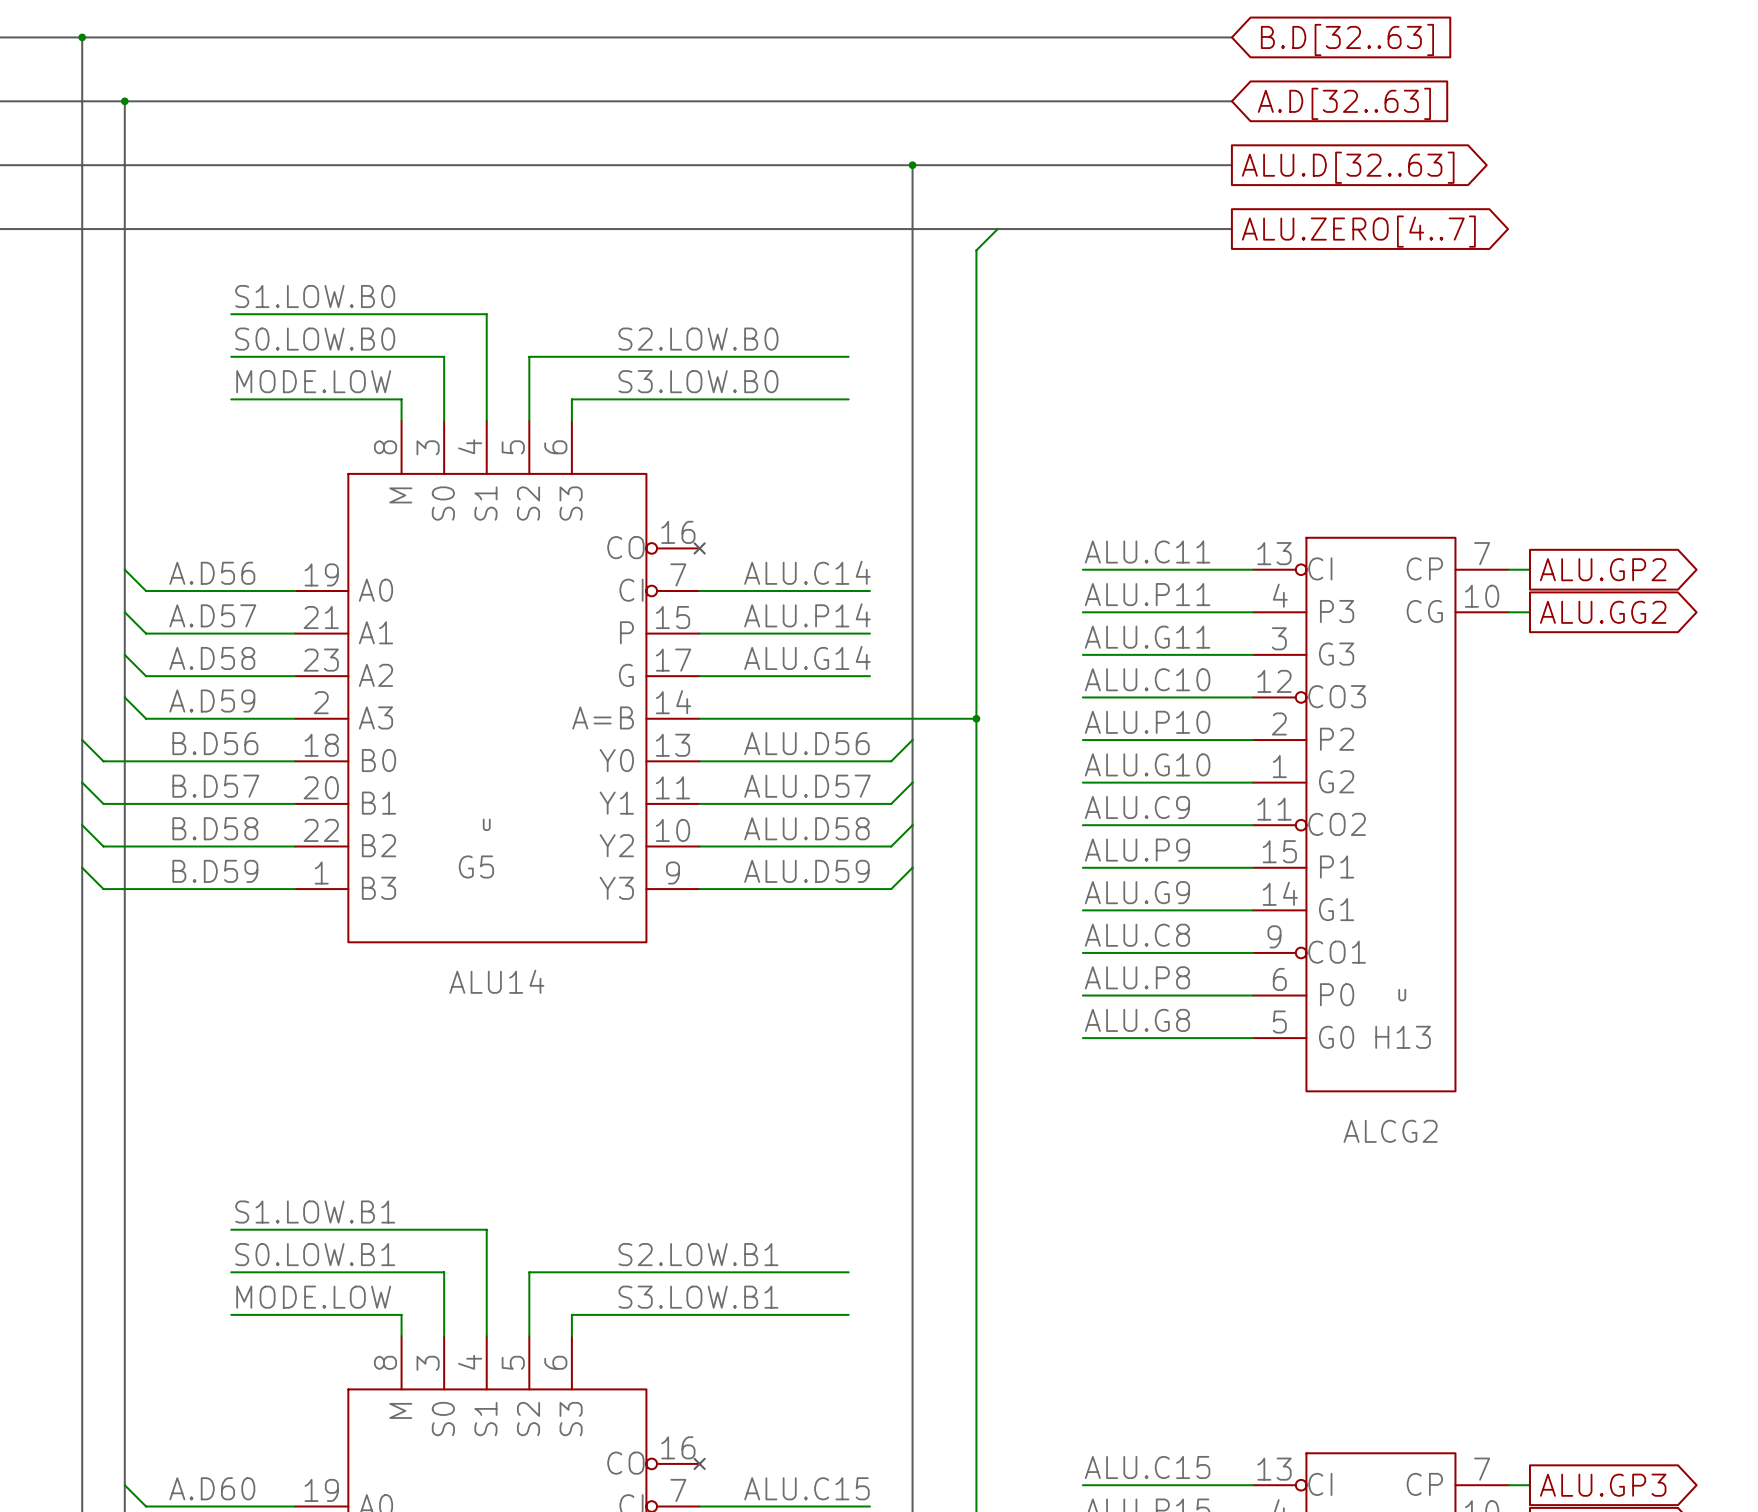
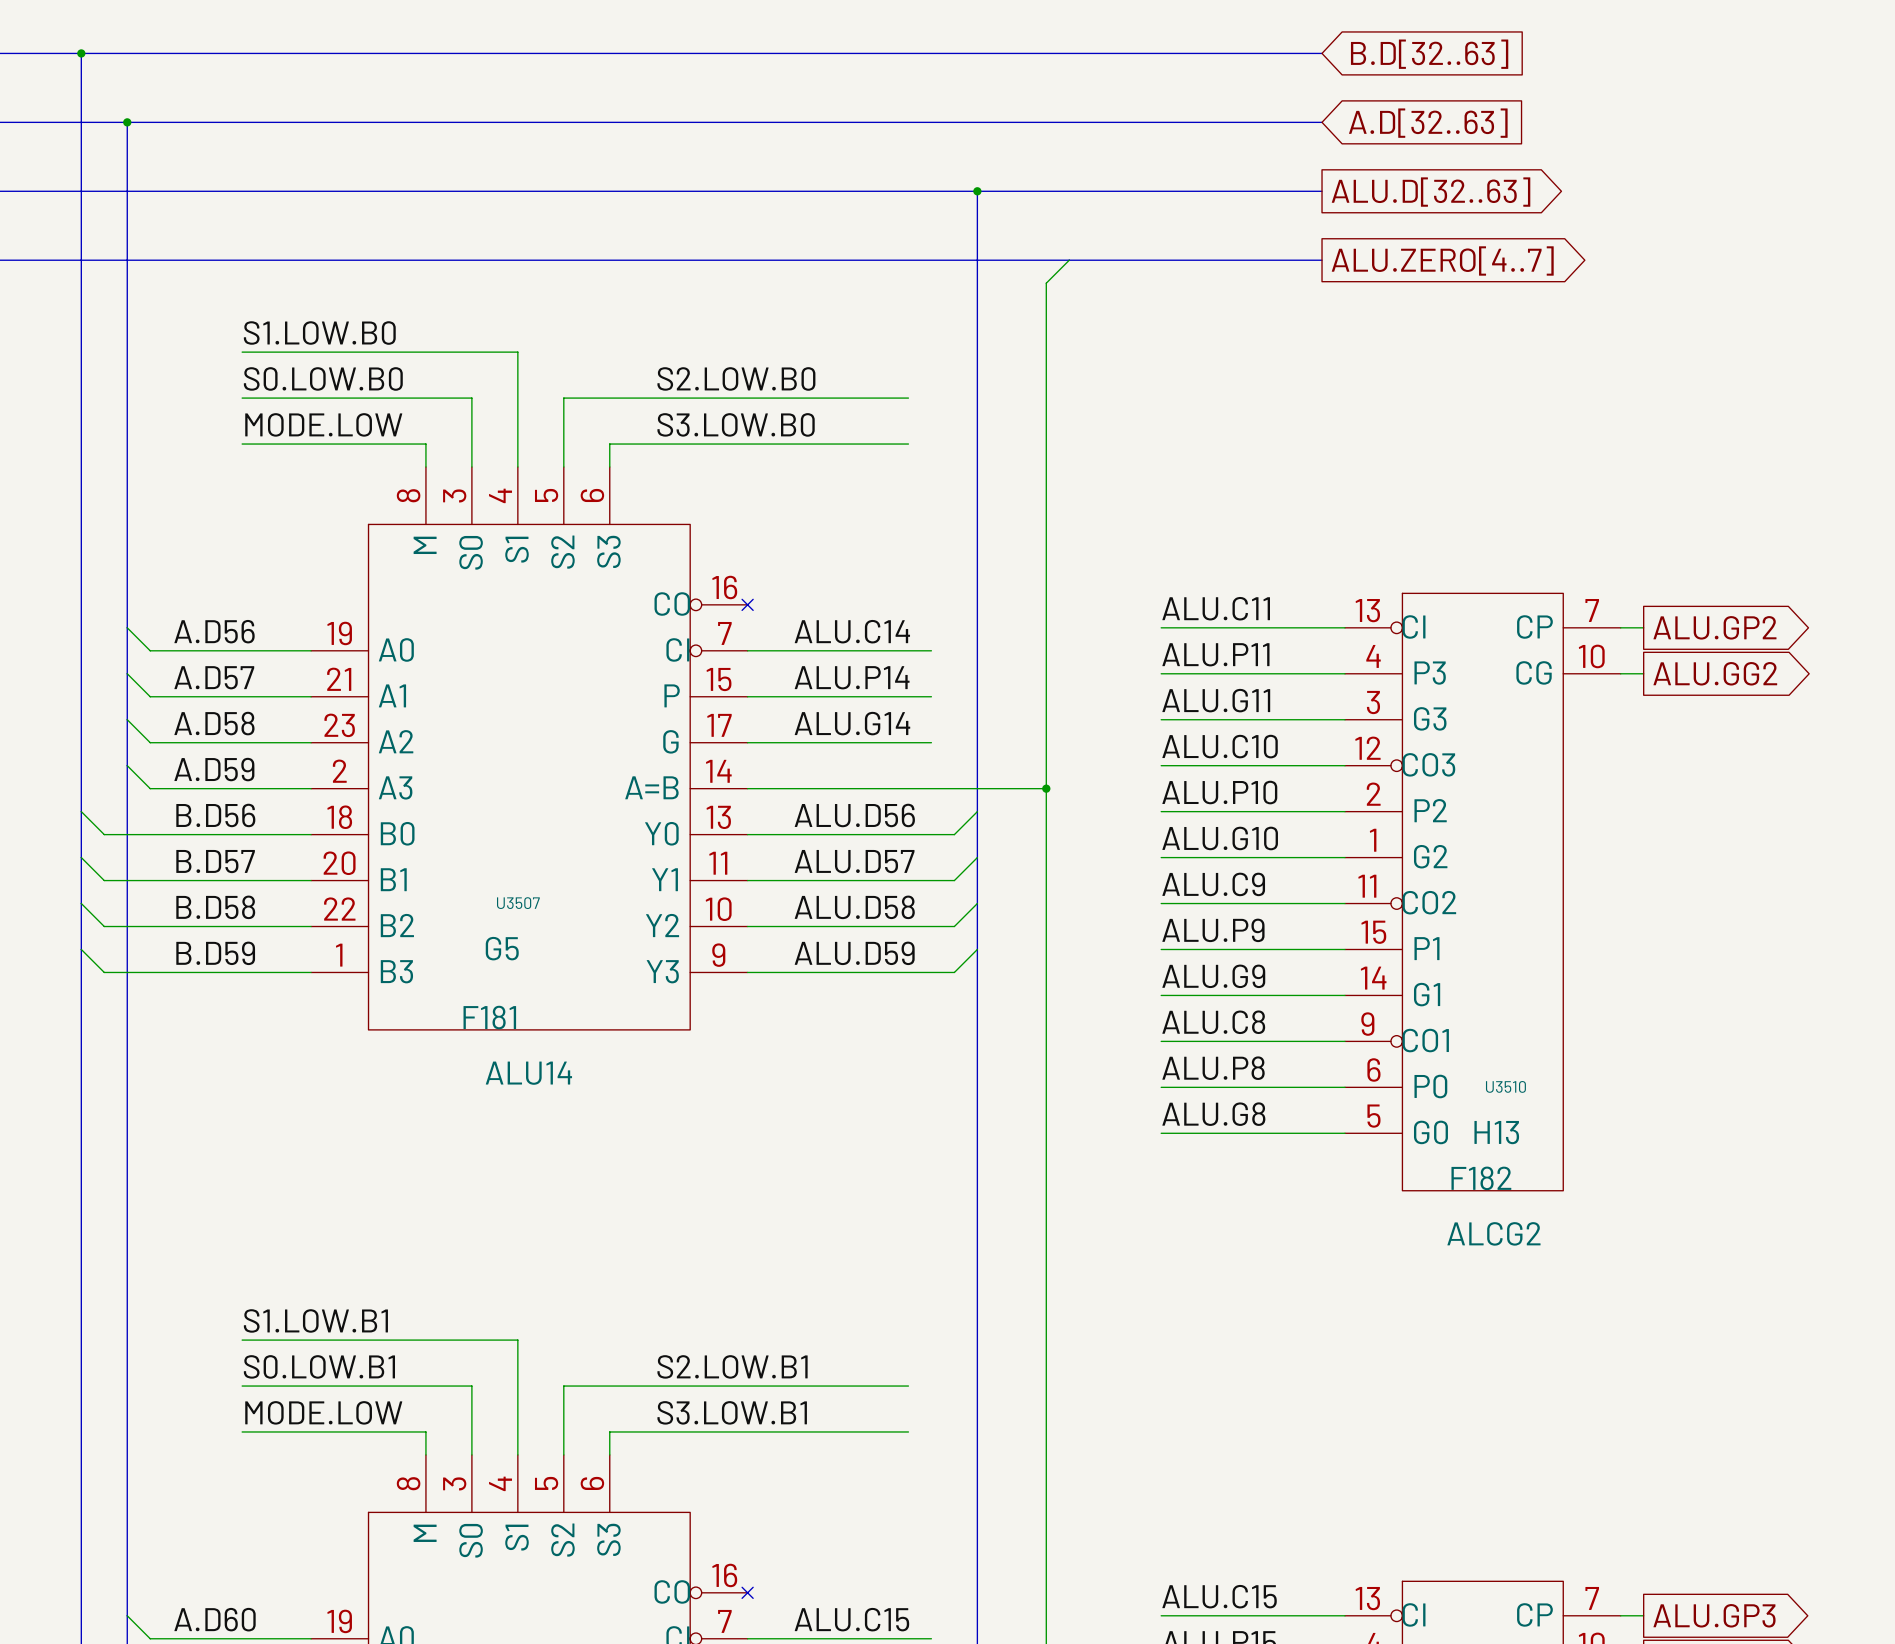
U name: U (486, 824) -> U3507 (518, 903)
U value: none -> F181 (489, 1017)
U name: U (1402, 995) -> U3510 (1505, 1086)
U value: none -> F182 (1481, 1178)

